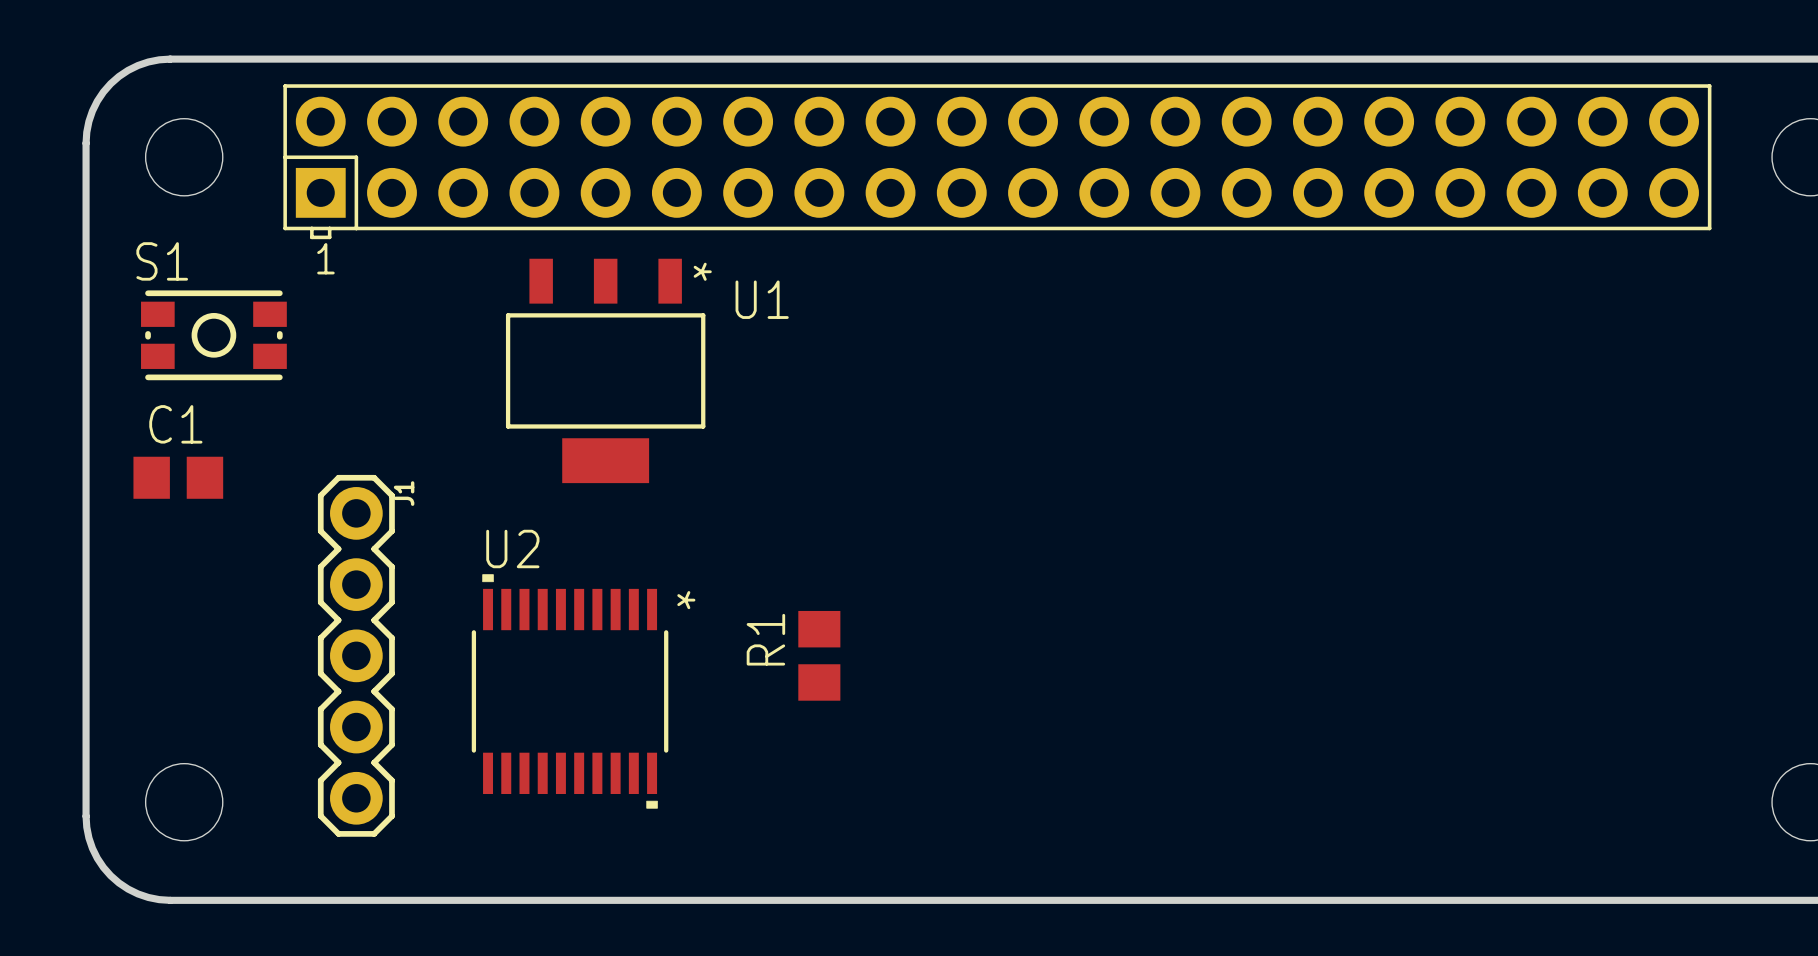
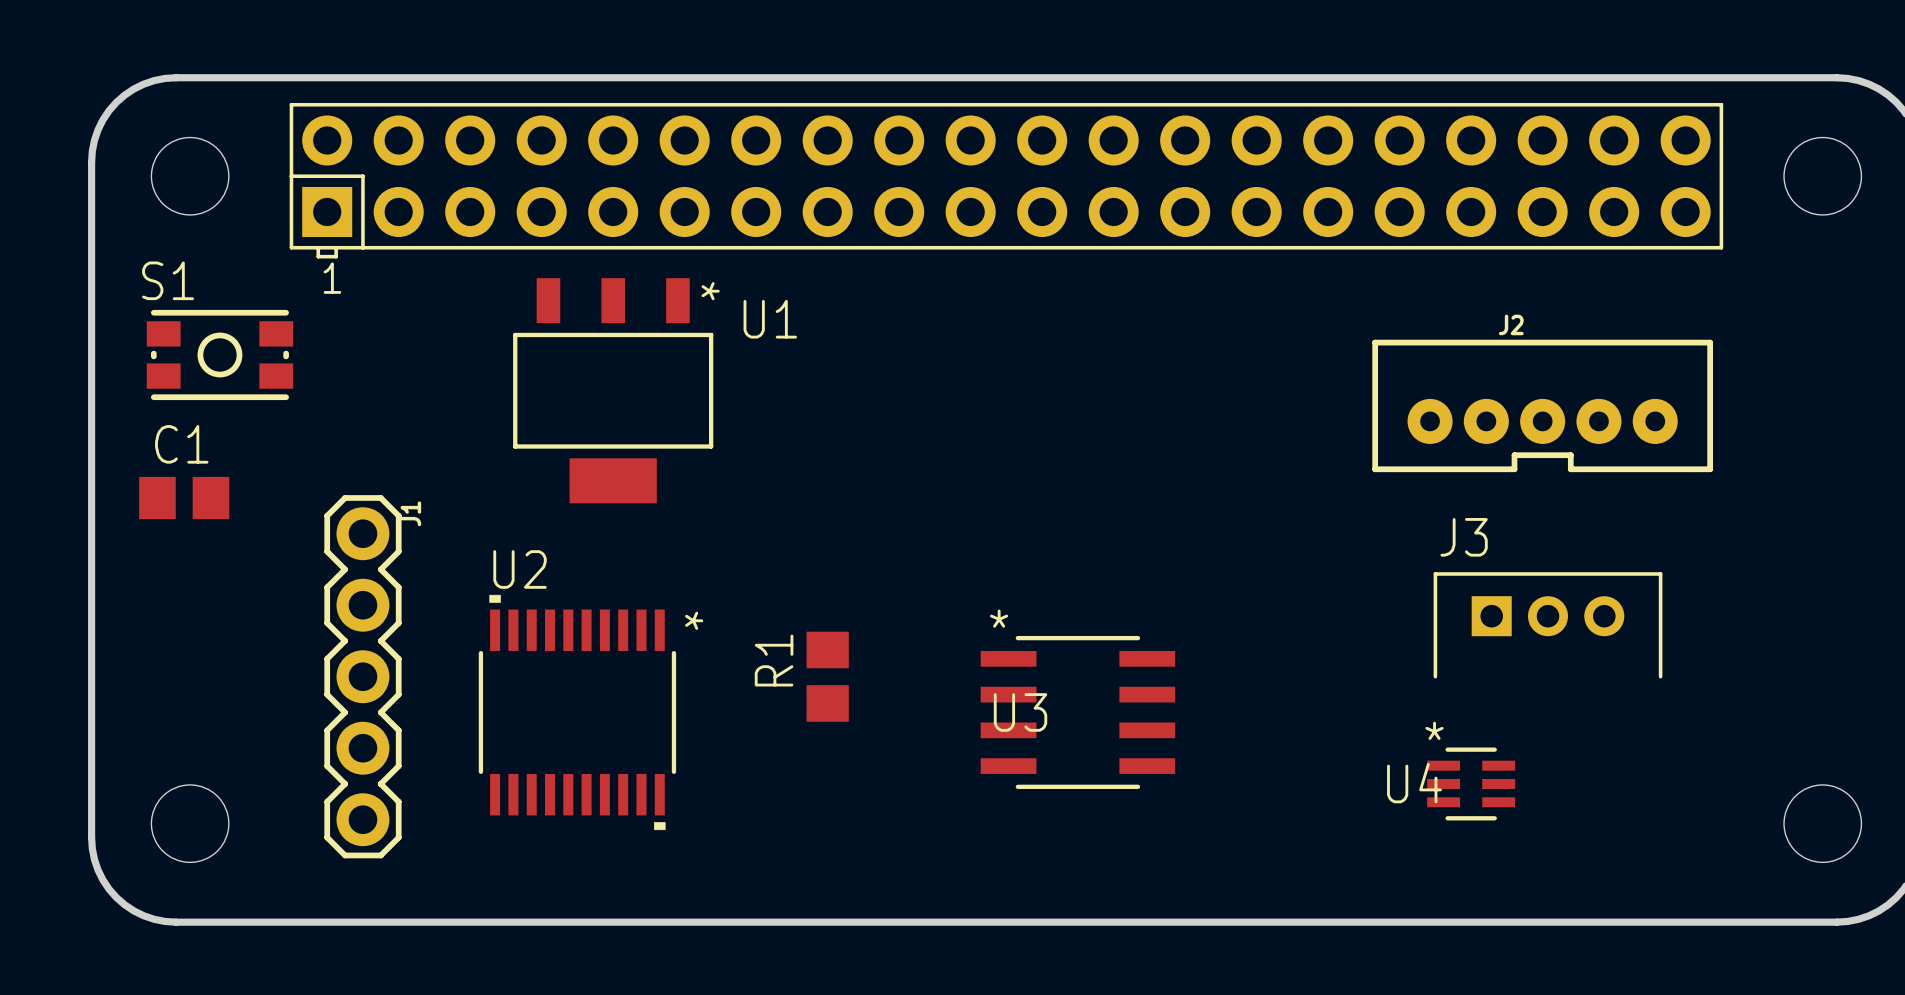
J2: none -> (1542, 405)
J3: none -> (1548, 625)
U3: none -> (1077, 712)
U4: none -> (1471, 783)

